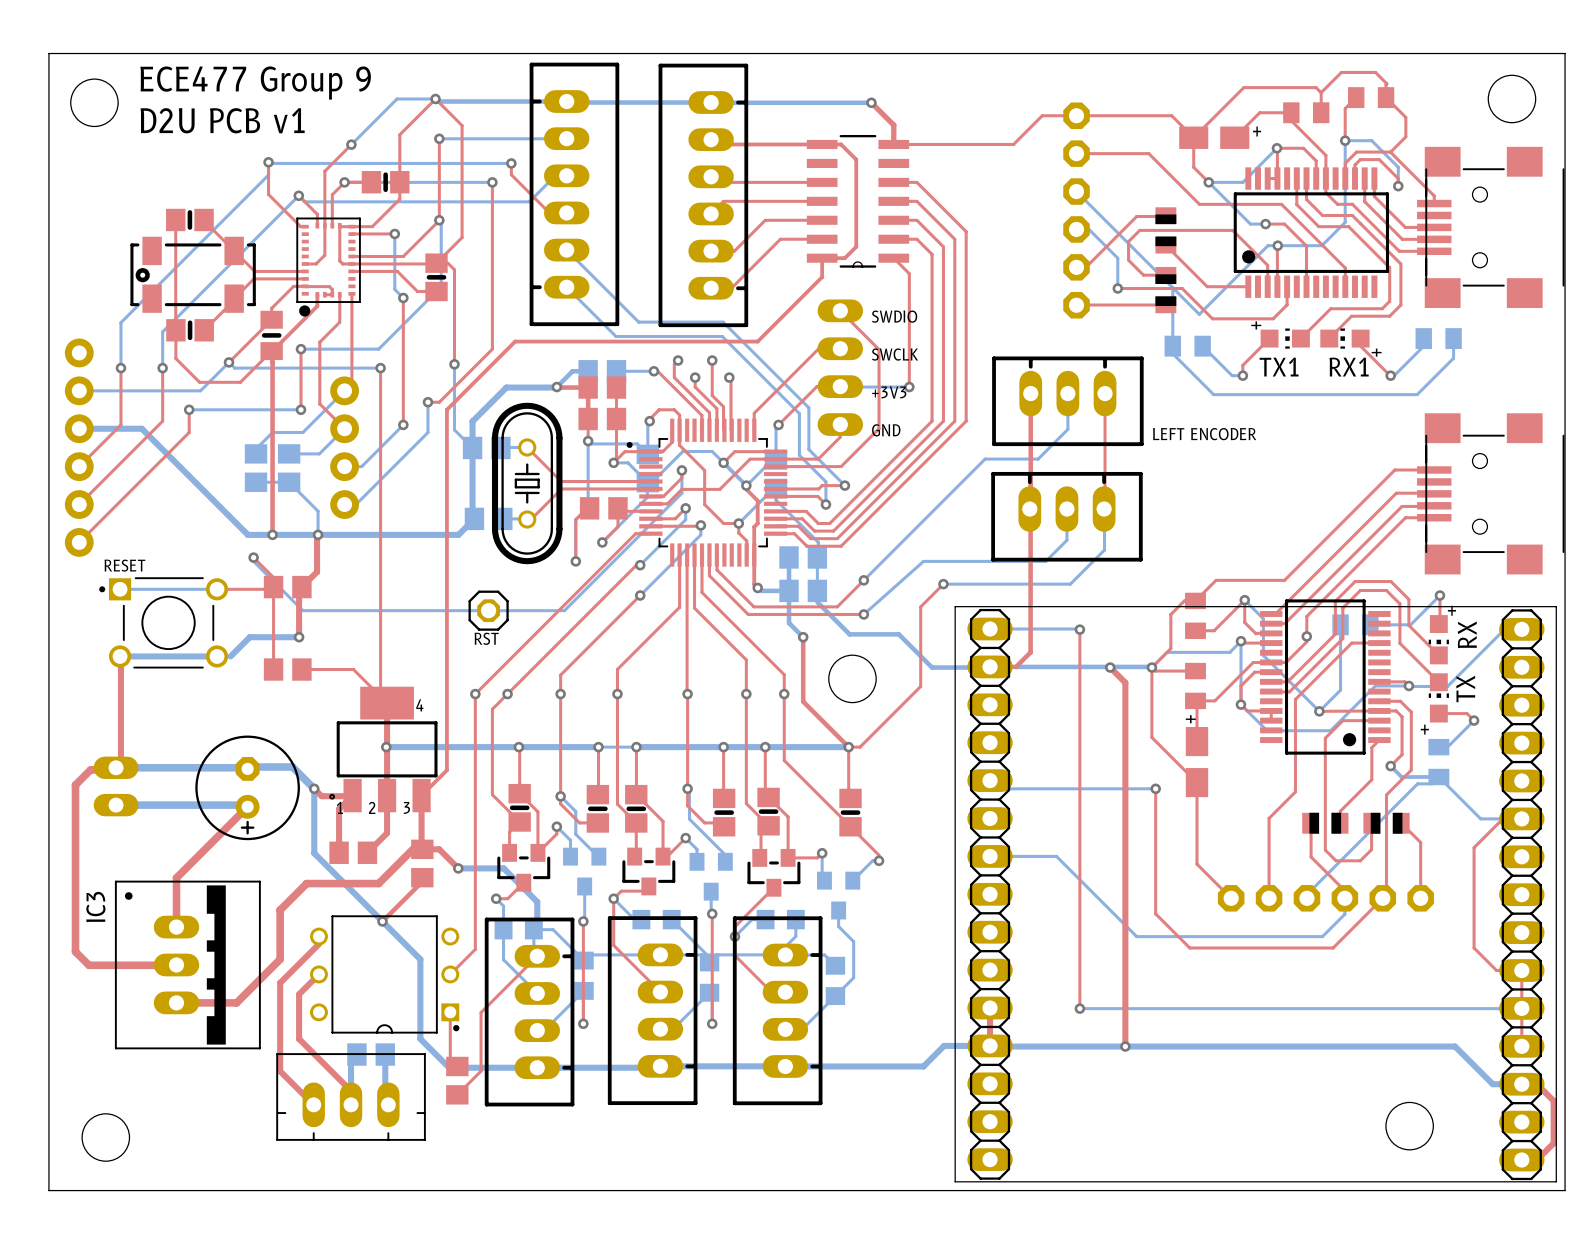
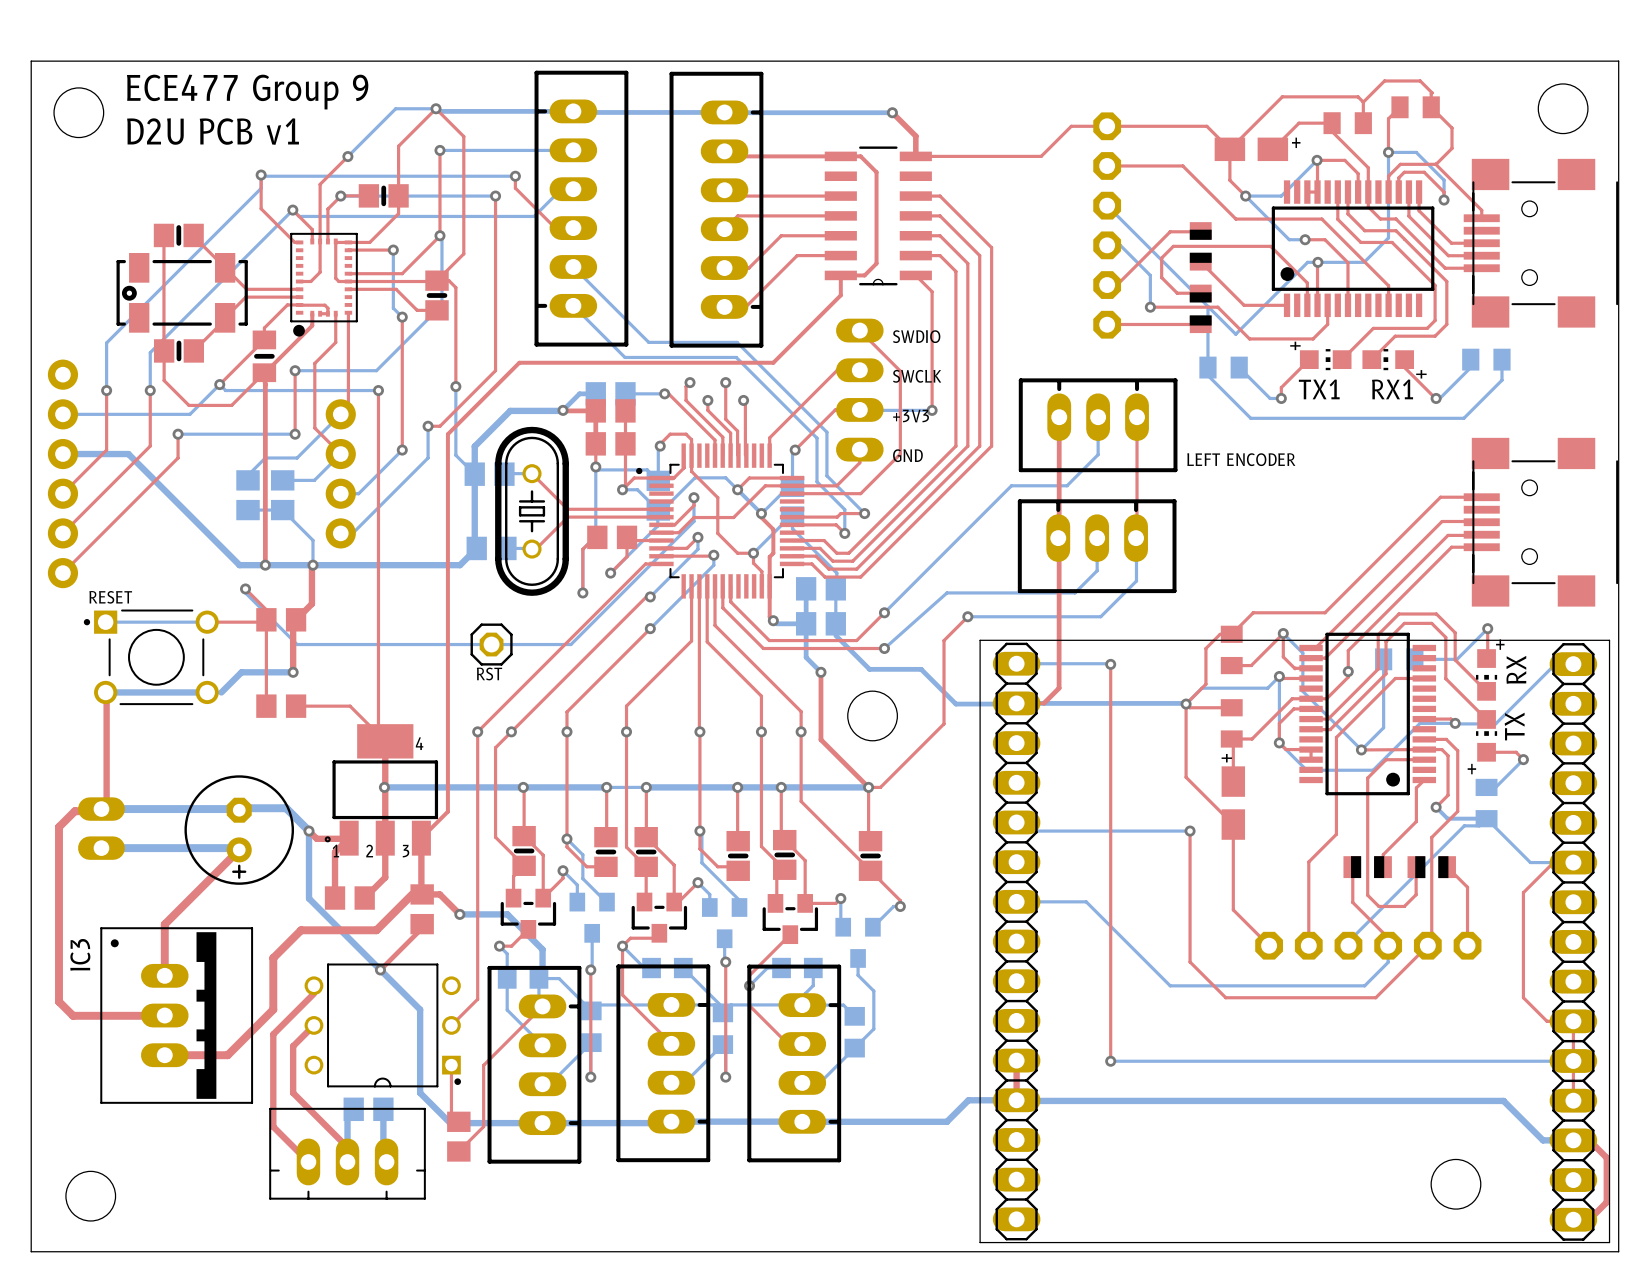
top track: (1110, 667) (1125, 682) (1125, 1046) -> none
via: (1110, 667) -> none
via: (1125, 1046) -> none

